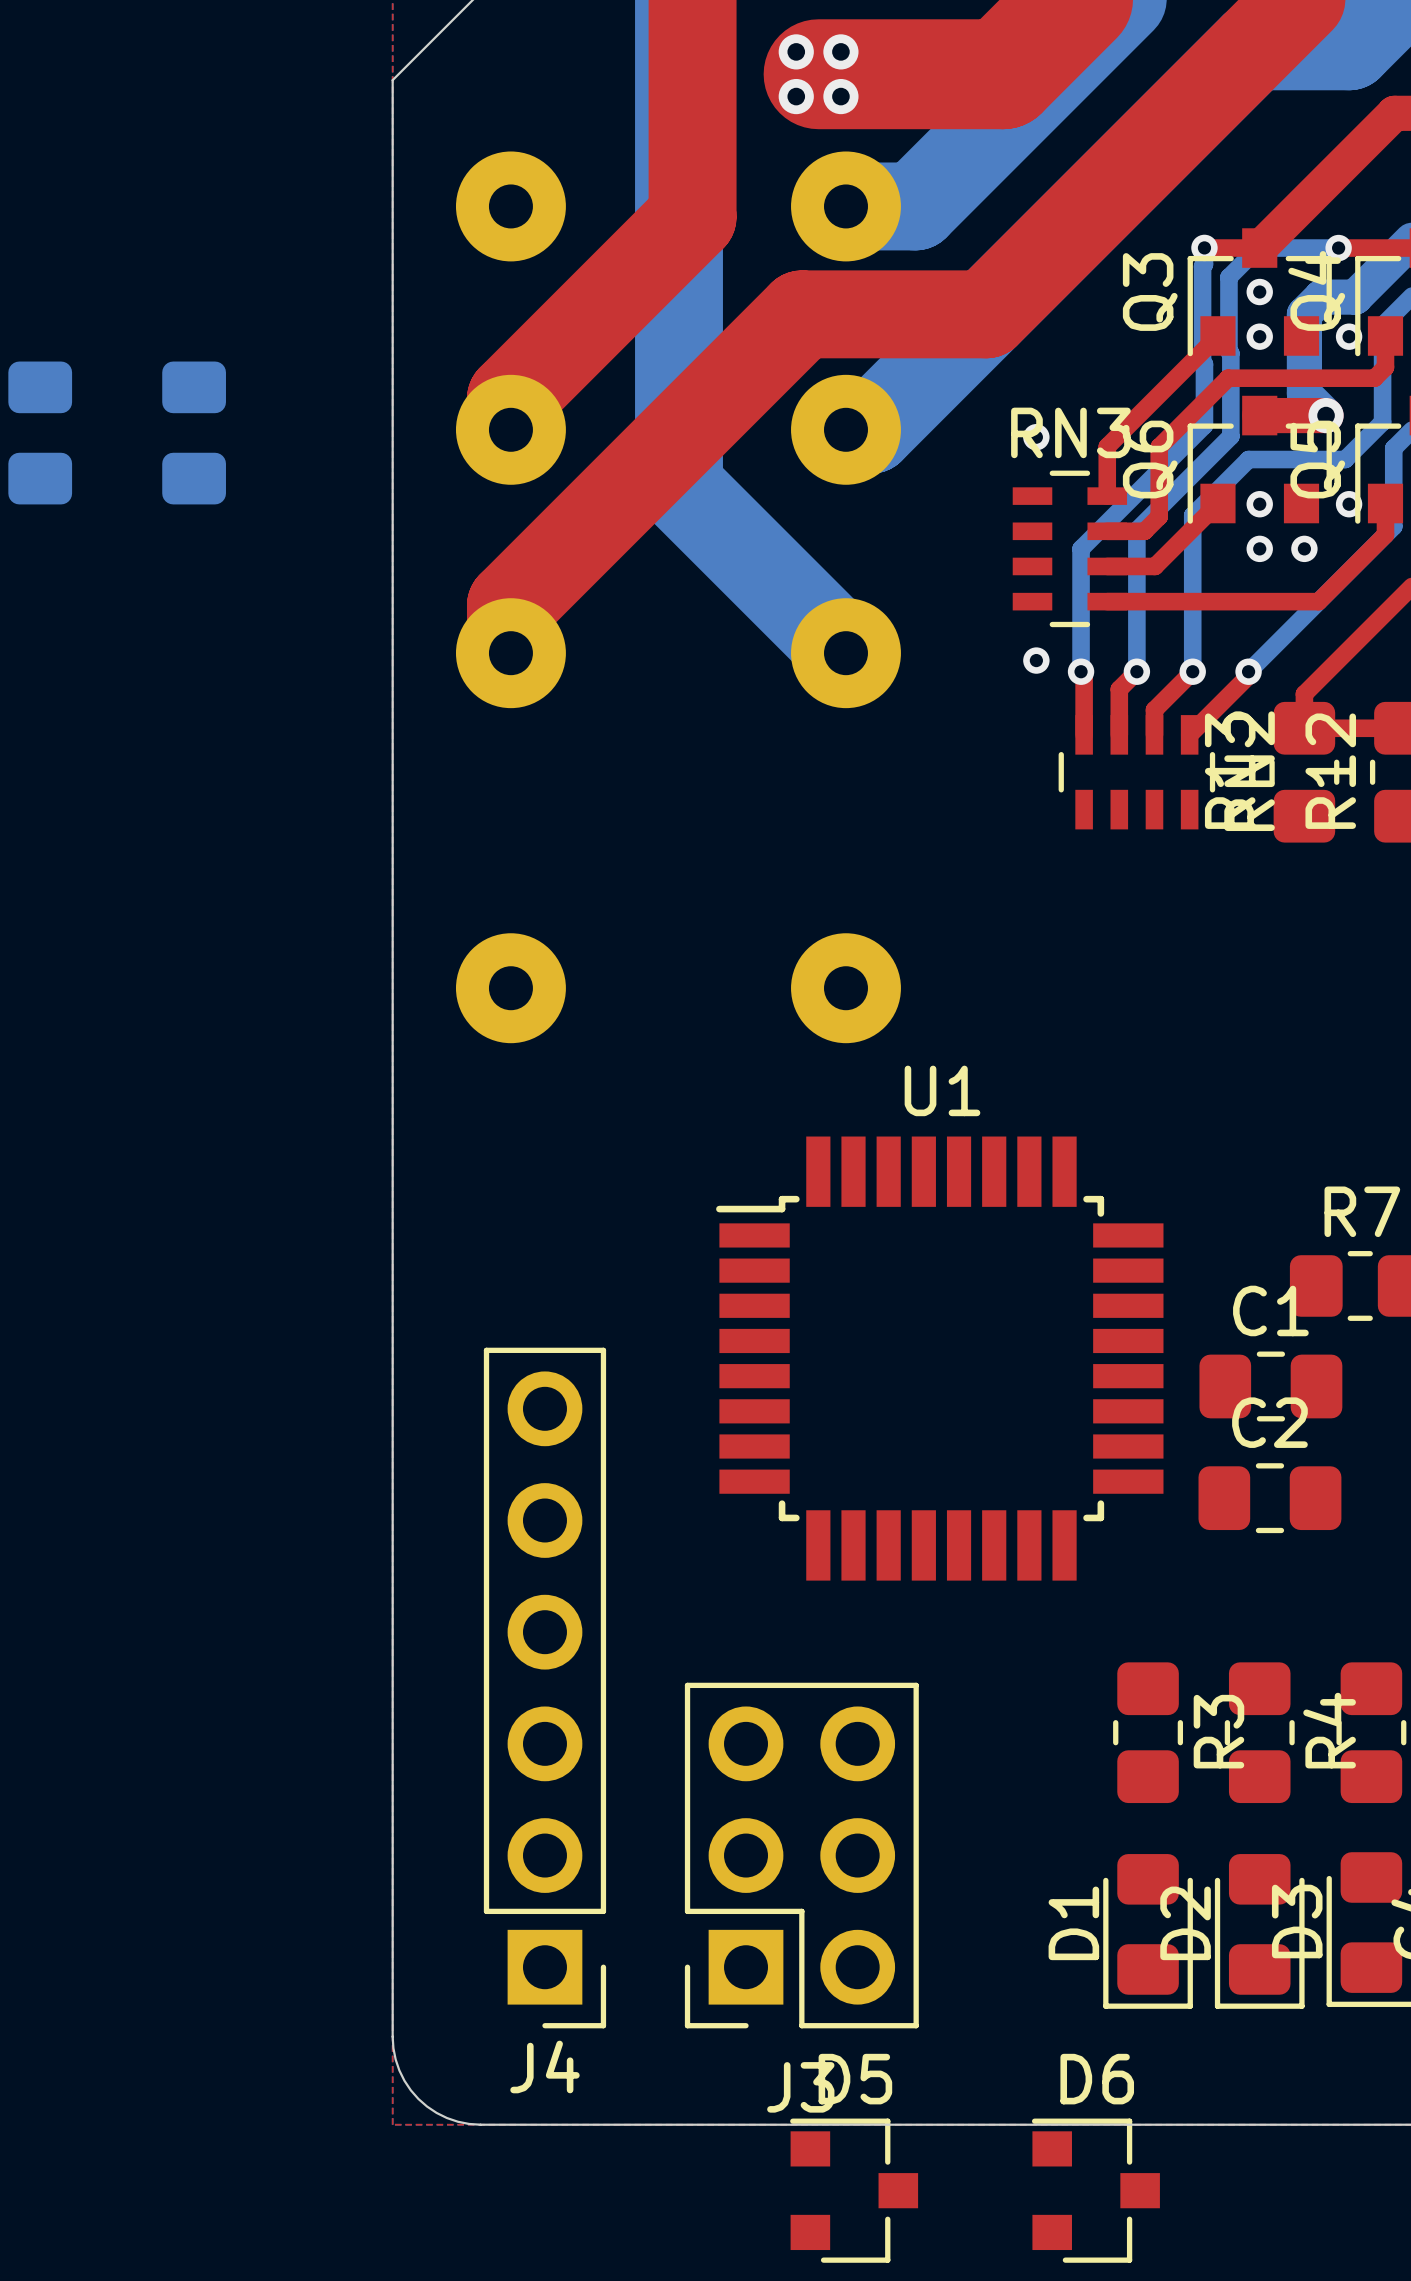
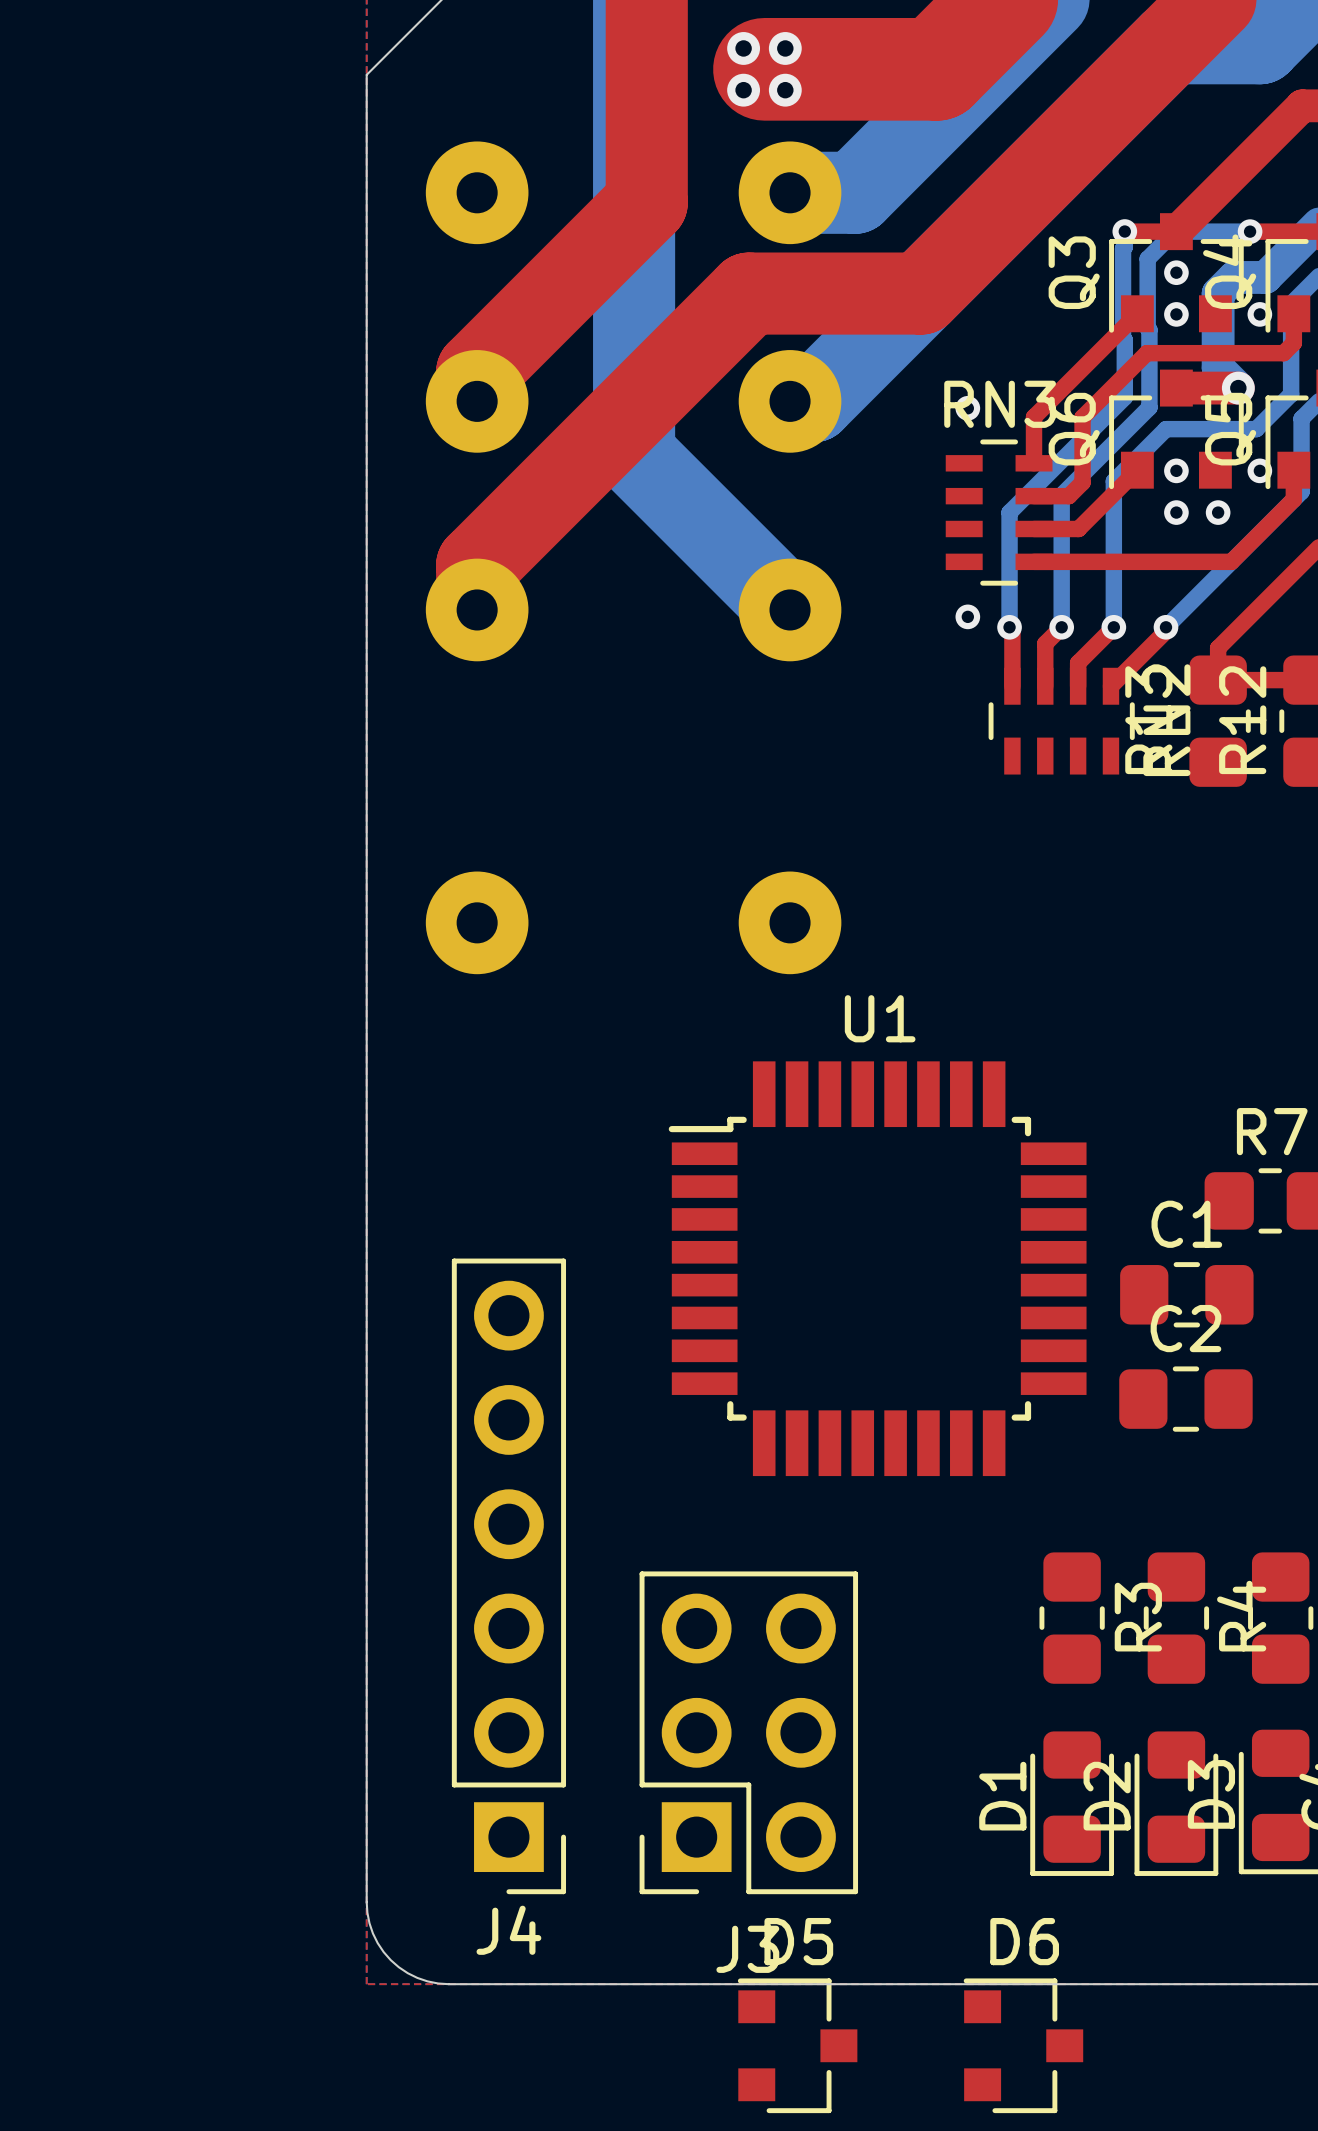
part: (40, 432) -> none
part: (194, 432) -> none

